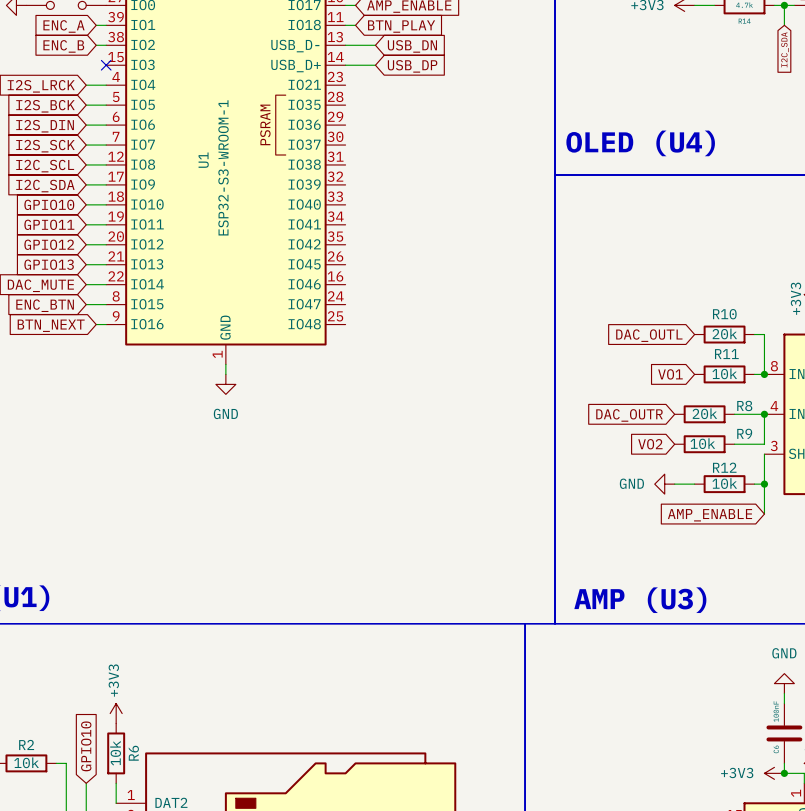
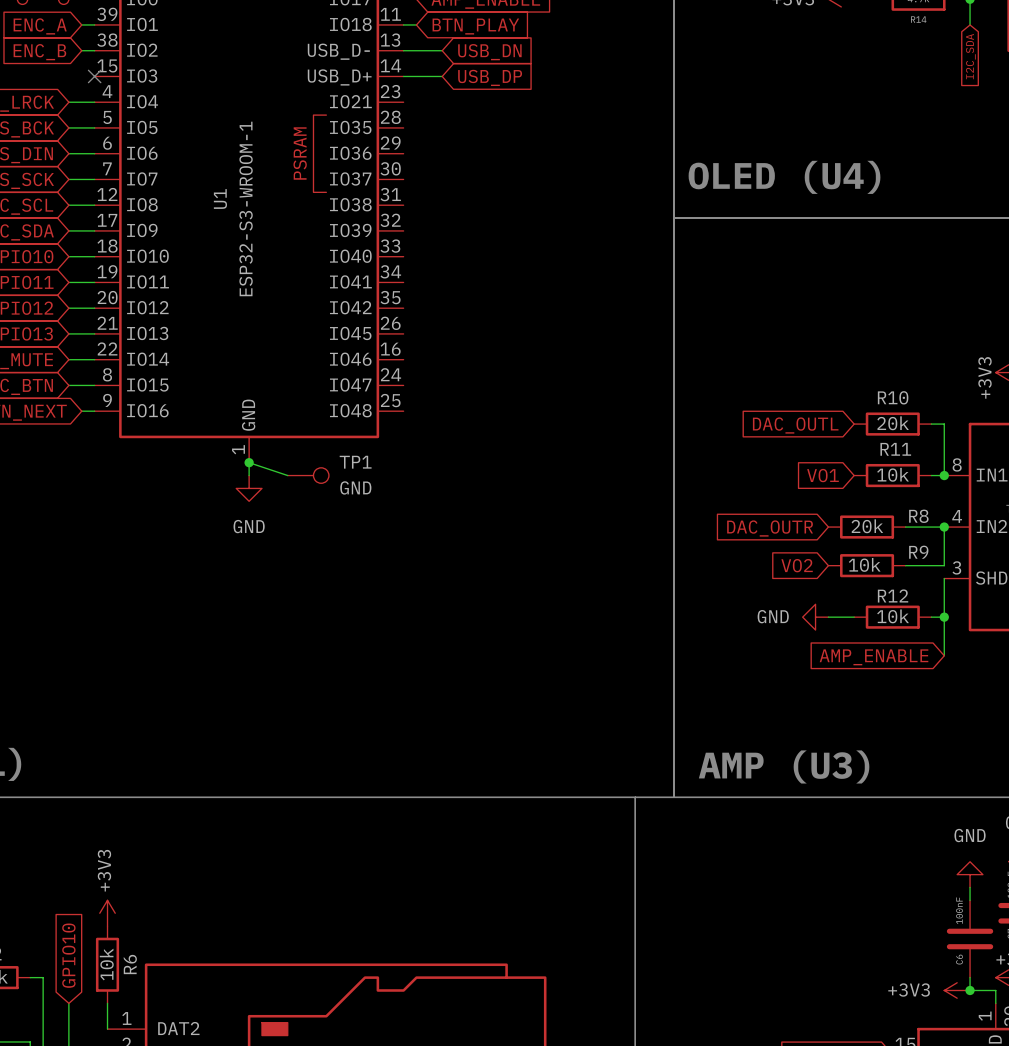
wire: none -> (249, 462) (287, 475)
junction: none -> (249, 462)
TP1: none -> GND (308, 475)

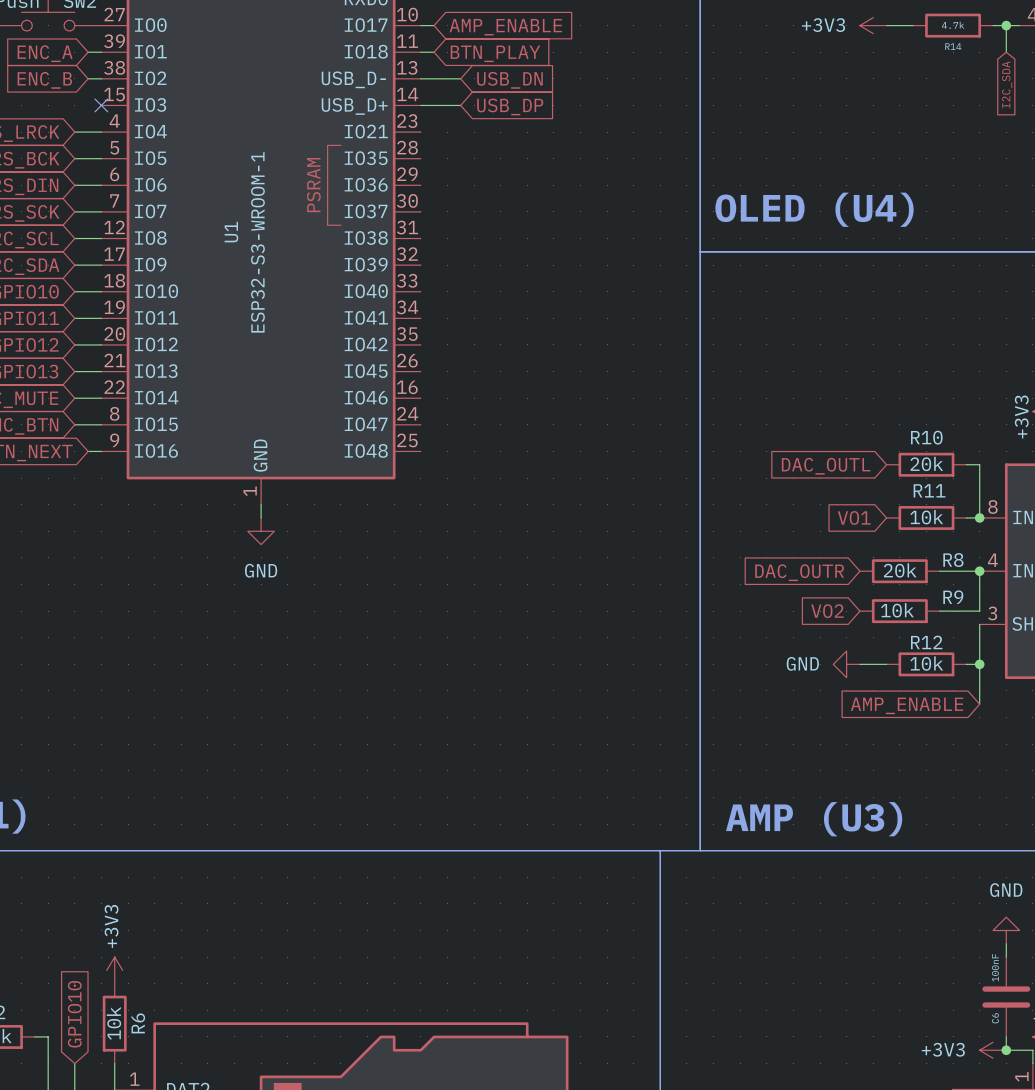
wire: (249, 462) (287, 475) -> none
junction: (249, 462) -> none
TP1: GND (308, 475) -> none

